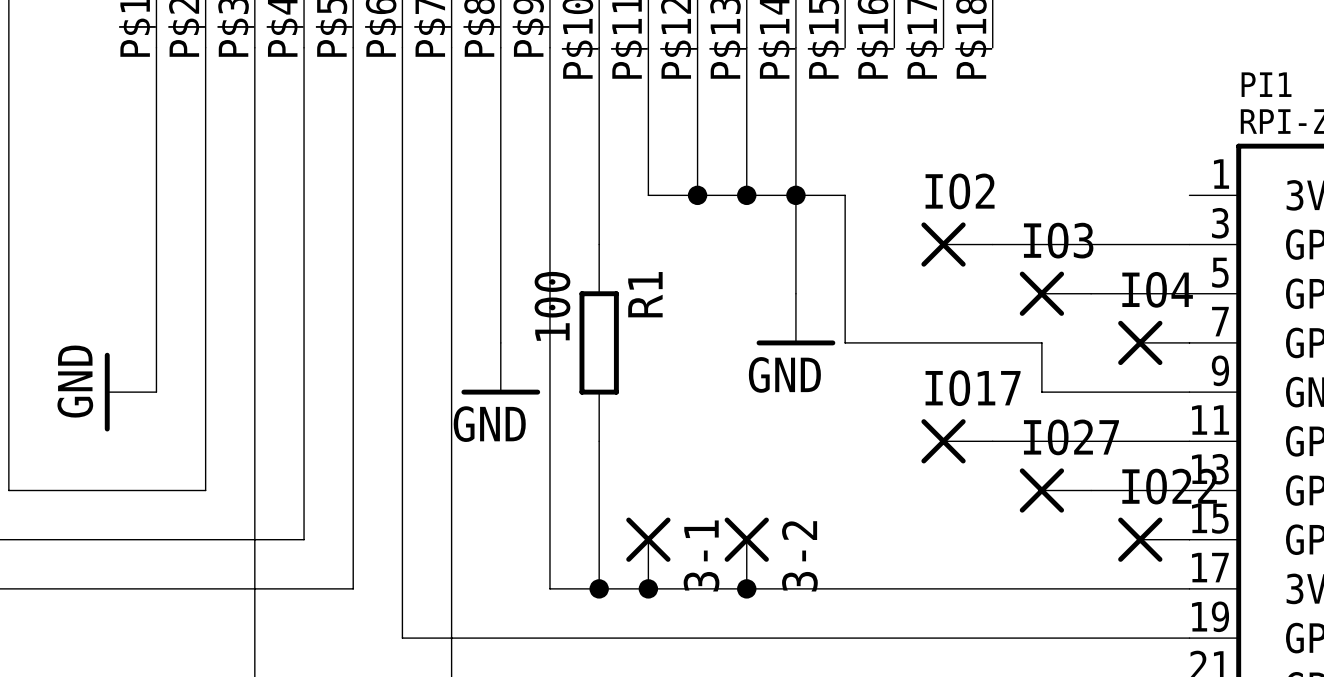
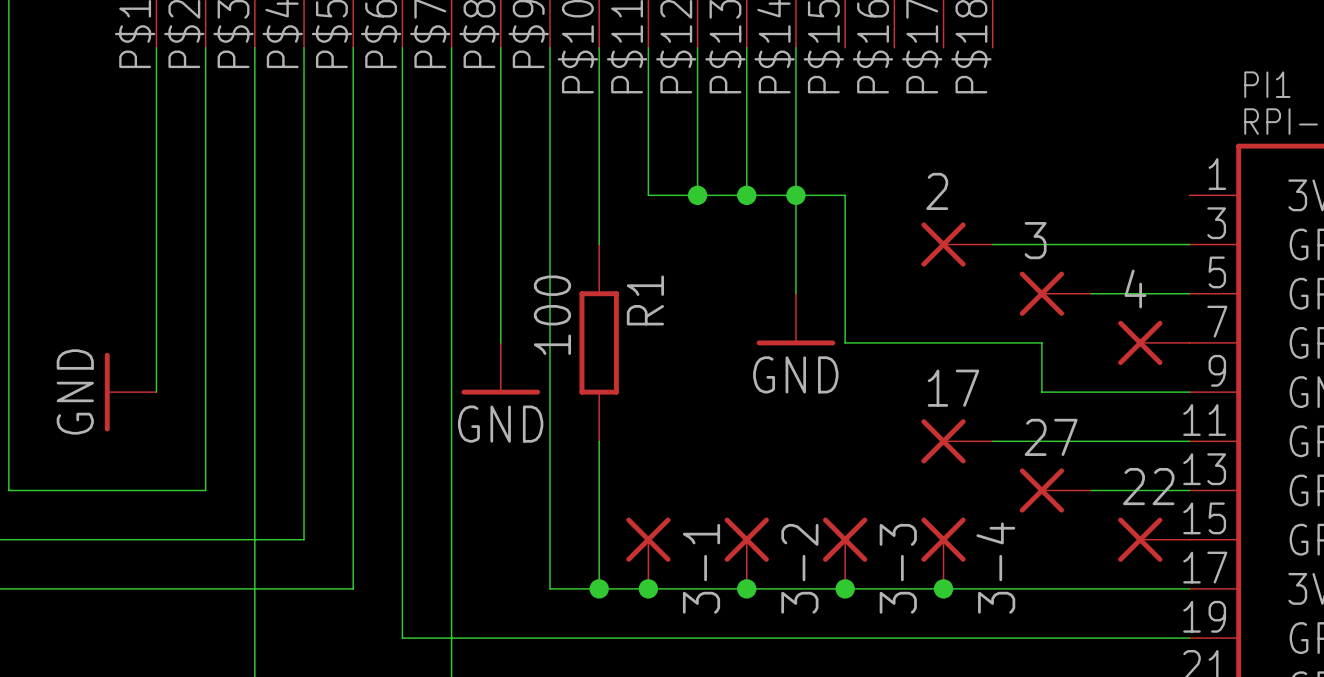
IO2 name: IO2 (960, 191) -> 2 (937, 191)
IO3 name: IO3 (1058, 240) -> 3 (1035, 240)
IO4 name: IO4 (1157, 289) -> 4 (1135, 288)
IO17 name: IO17 (973, 388) -> 17 (953, 388)
IO27 name: IO27 (1071, 437) -> 27 (1051, 437)
IO22 name: IO22 (1169, 486) -> 22 (1148, 486)
3-3: none -> (845, 553)
3-4: none -> (943, 553)
junction: none -> (845, 588)
junction: none -> (943, 588)

